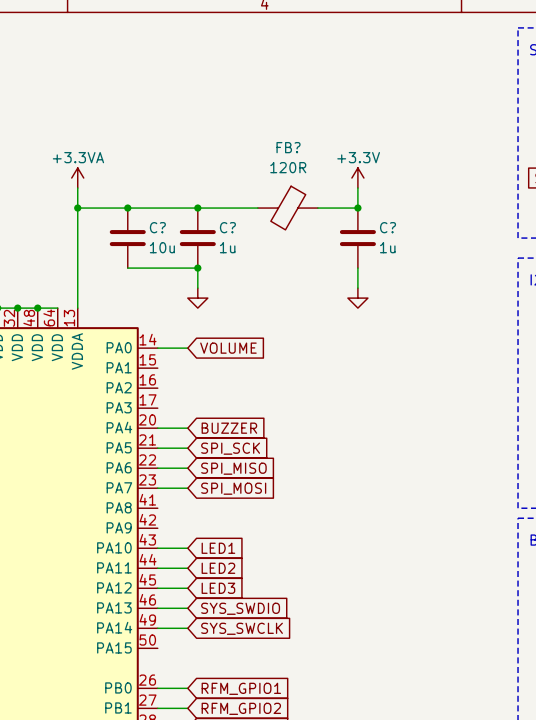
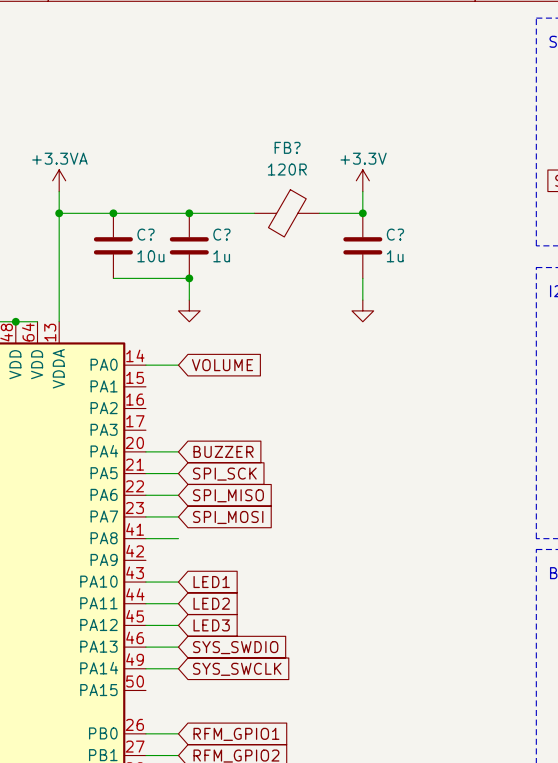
wire: none -> (145, 538) (178, 538)

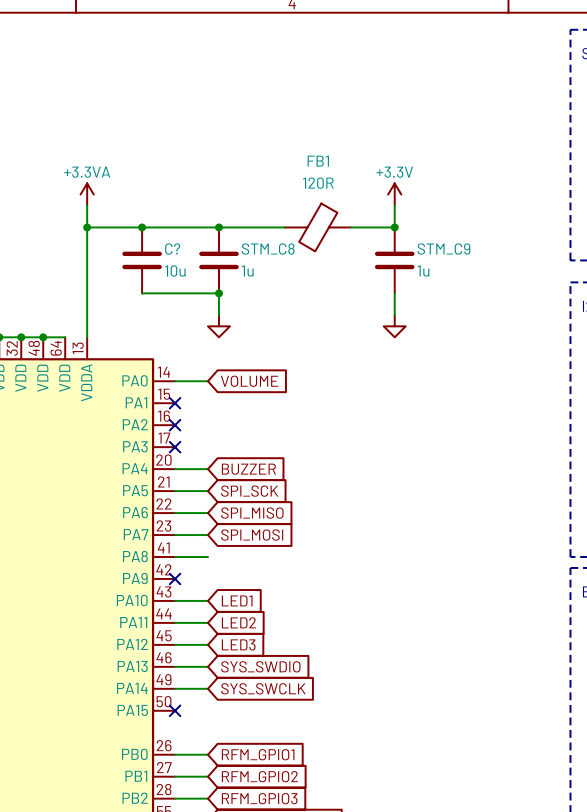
FB? name: FB? (287, 147) -> FB1 (318, 161)
C? name: C? (221, 234) -> STM_C8 (268, 249)
C? name: C? (395, 234) -> STM_C9 (443, 249)
no-connect mark: none -> (175, 403)
no-connect mark: none -> (175, 425)
no-connect mark: none -> (175, 447)
no-connect mark: none -> (175, 578)
no-connect mark: none -> (175, 710)

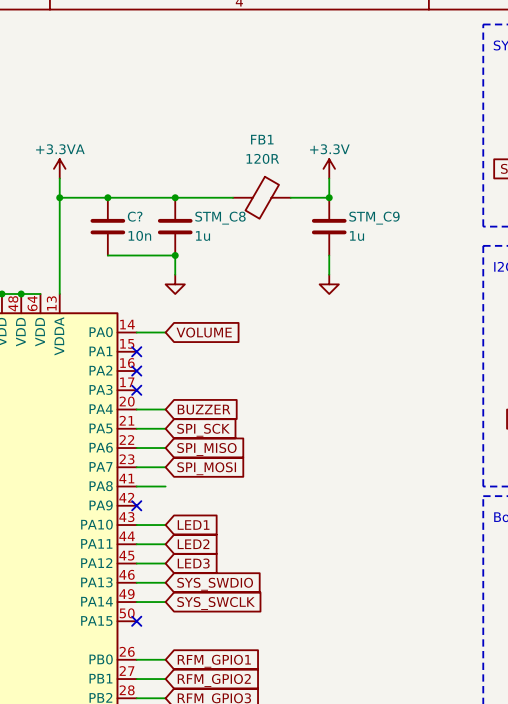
C? value: 10u (175, 271) -> 10n (139, 235)

